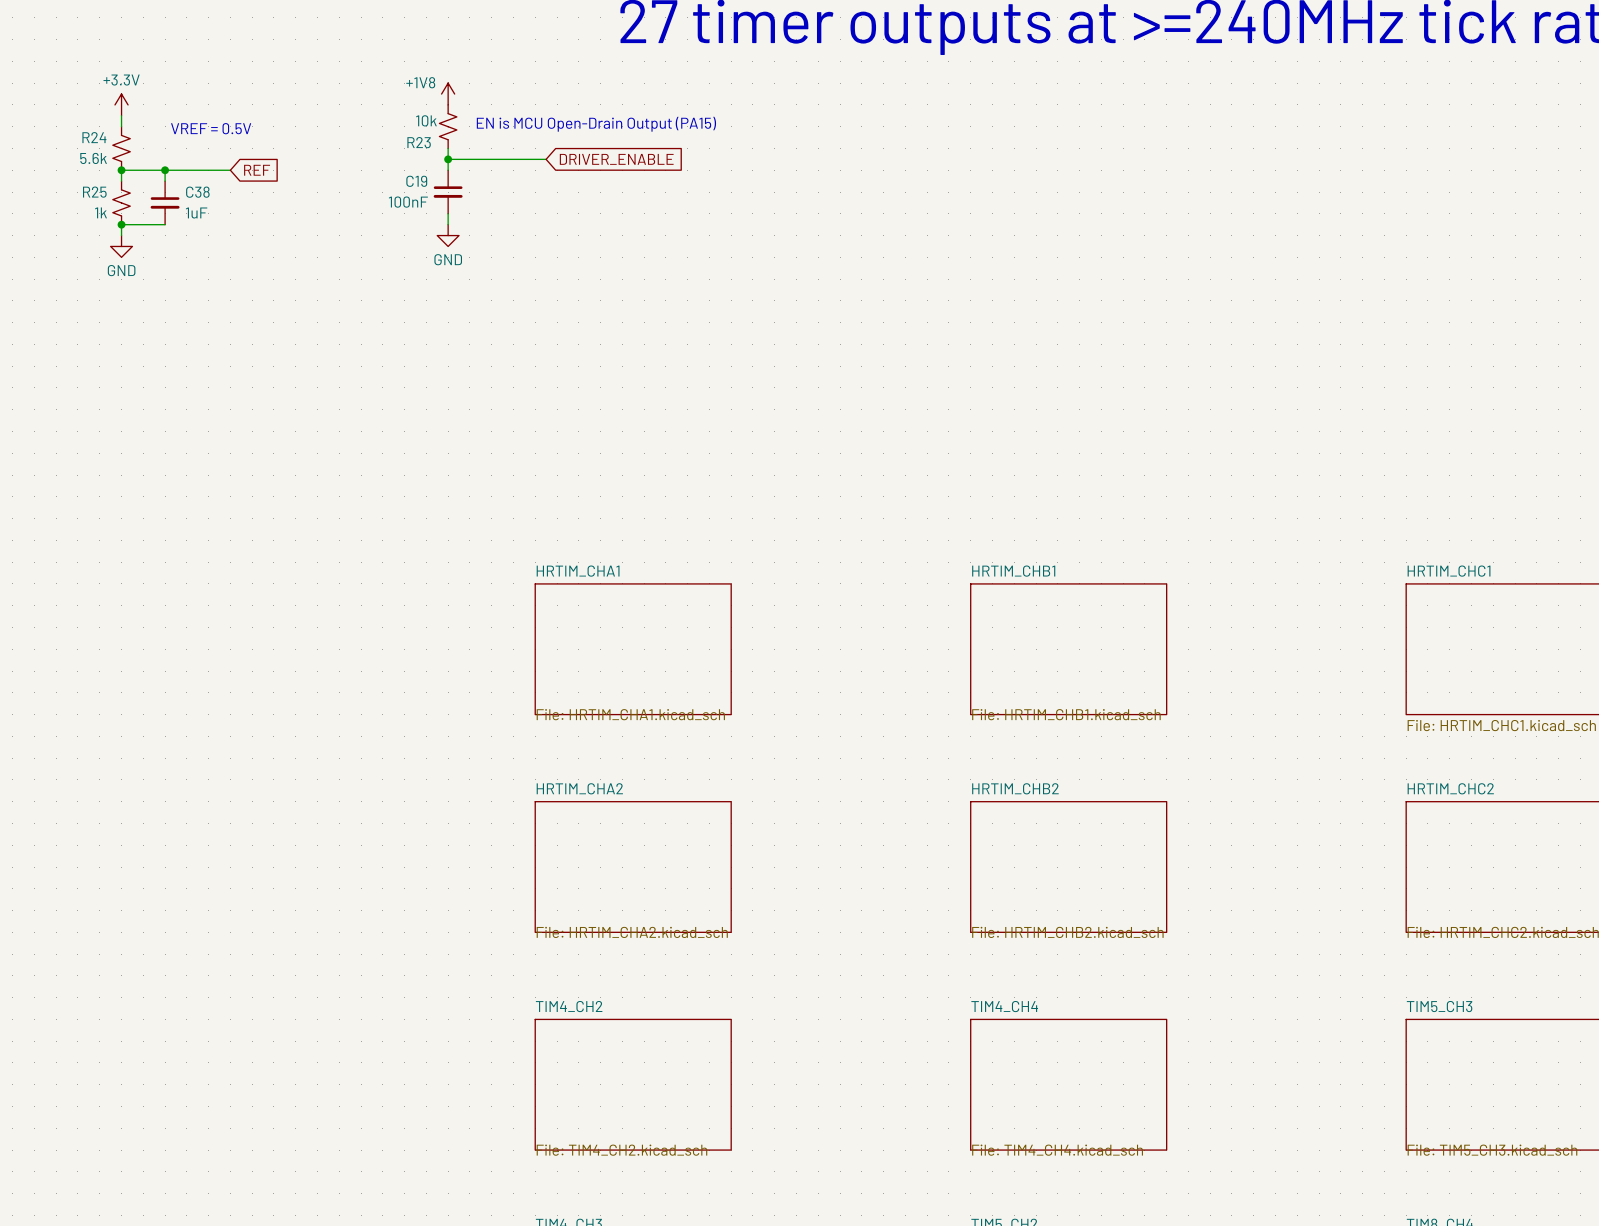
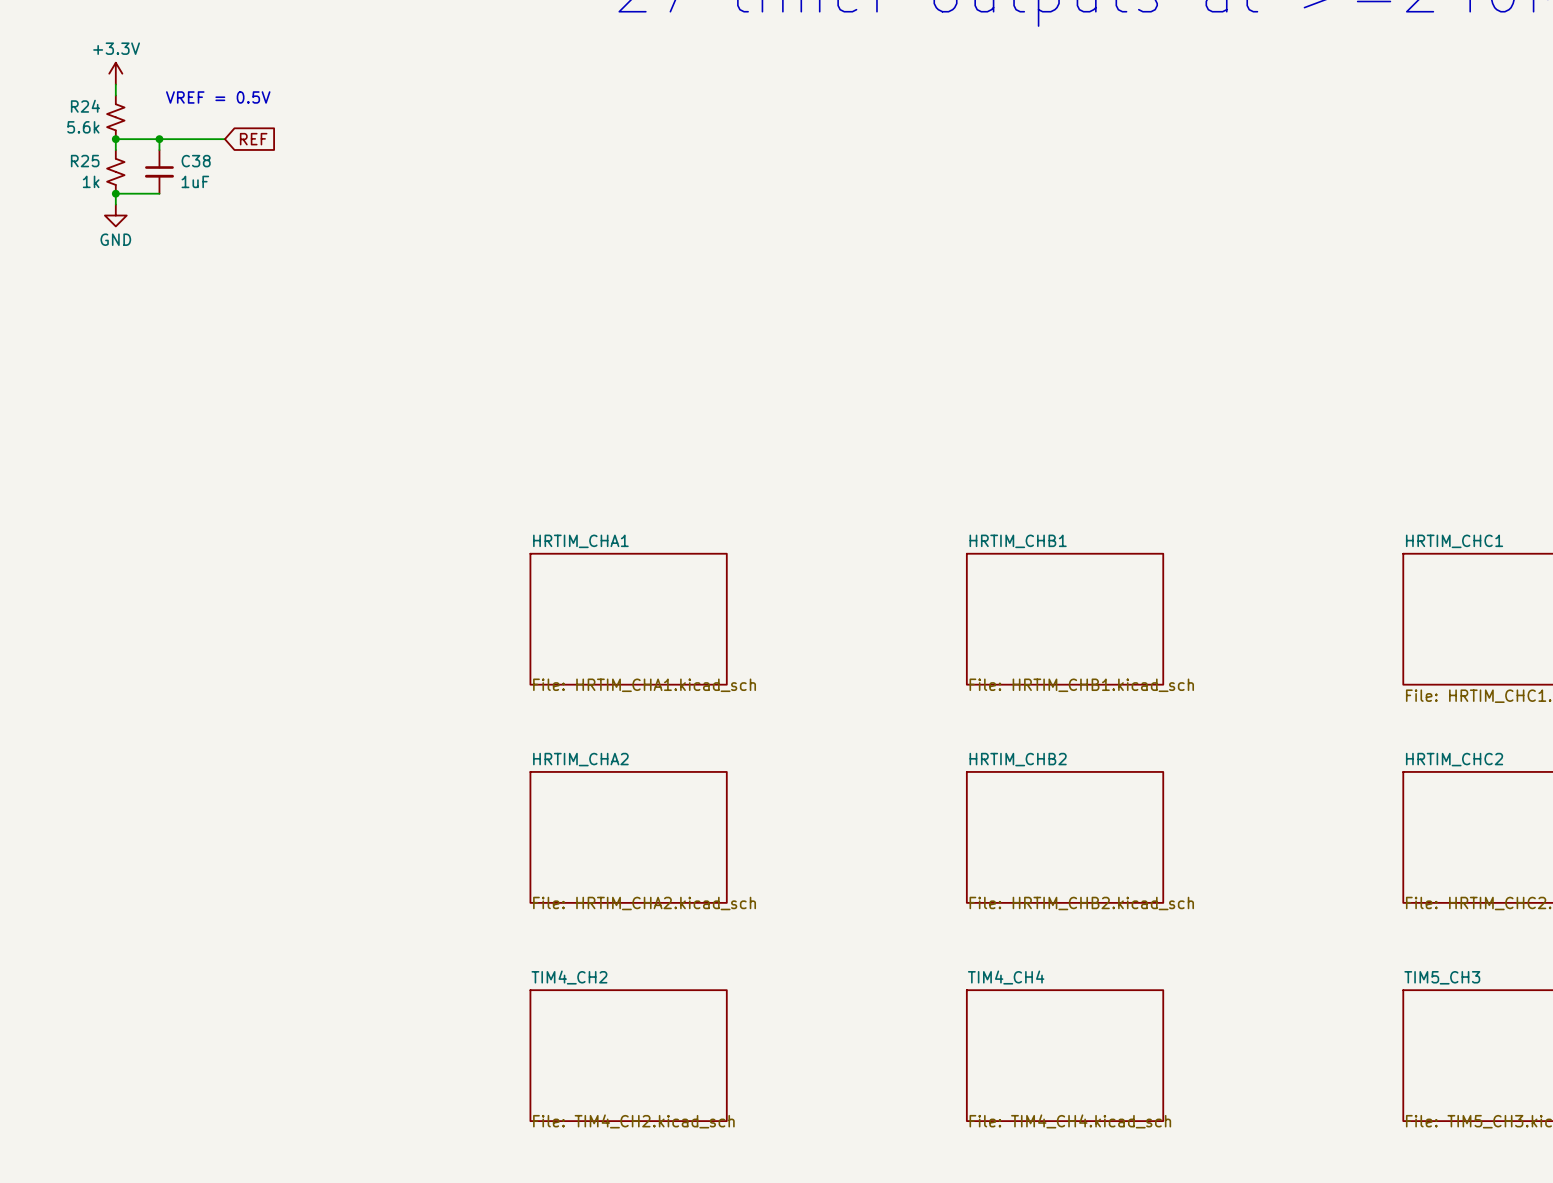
power symbol: +1V8 (448, 94) -> none
text: EN is MCU Open-Drain Output (PA15) (596, 124) -> none
R23: 10k (448, 126) -> none
wire: (448, 148) (448, 170) -> none
wire: (448, 159) (546, 159) -> none
junction: (448, 159) -> none
global label: DRIVER_ENABLE (616, 159) -> none
C19: 100nF (448, 192) -> none
wire: (448, 213) (448, 224) -> none
power symbol: GND (448, 235) -> none

